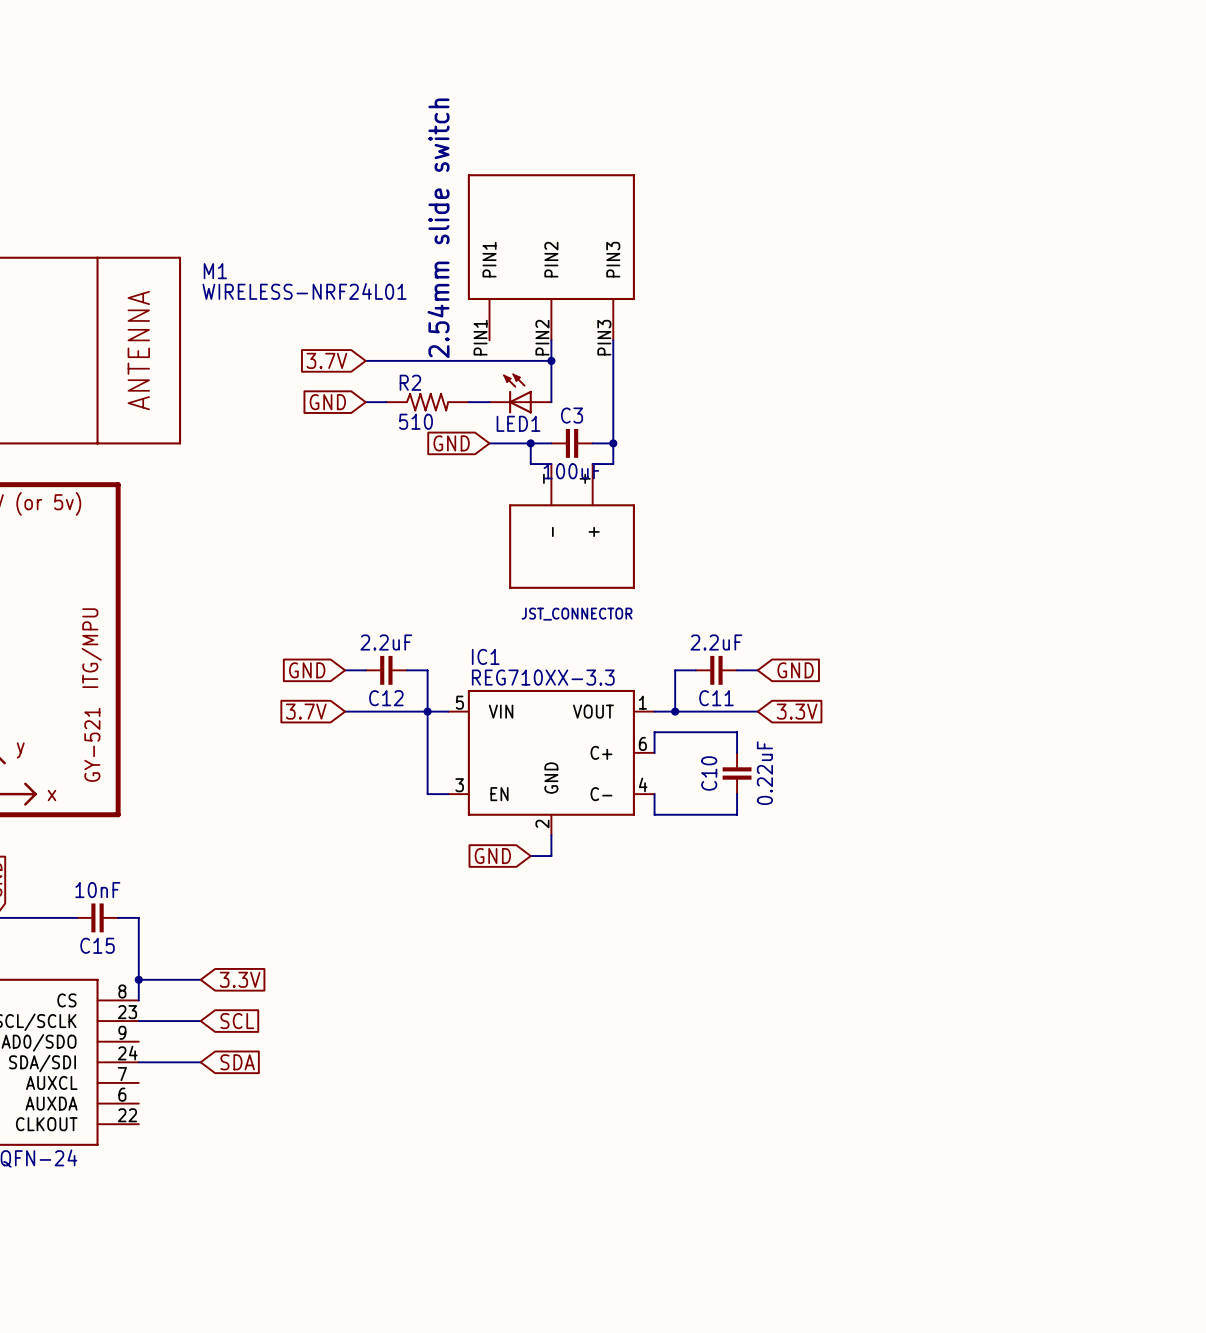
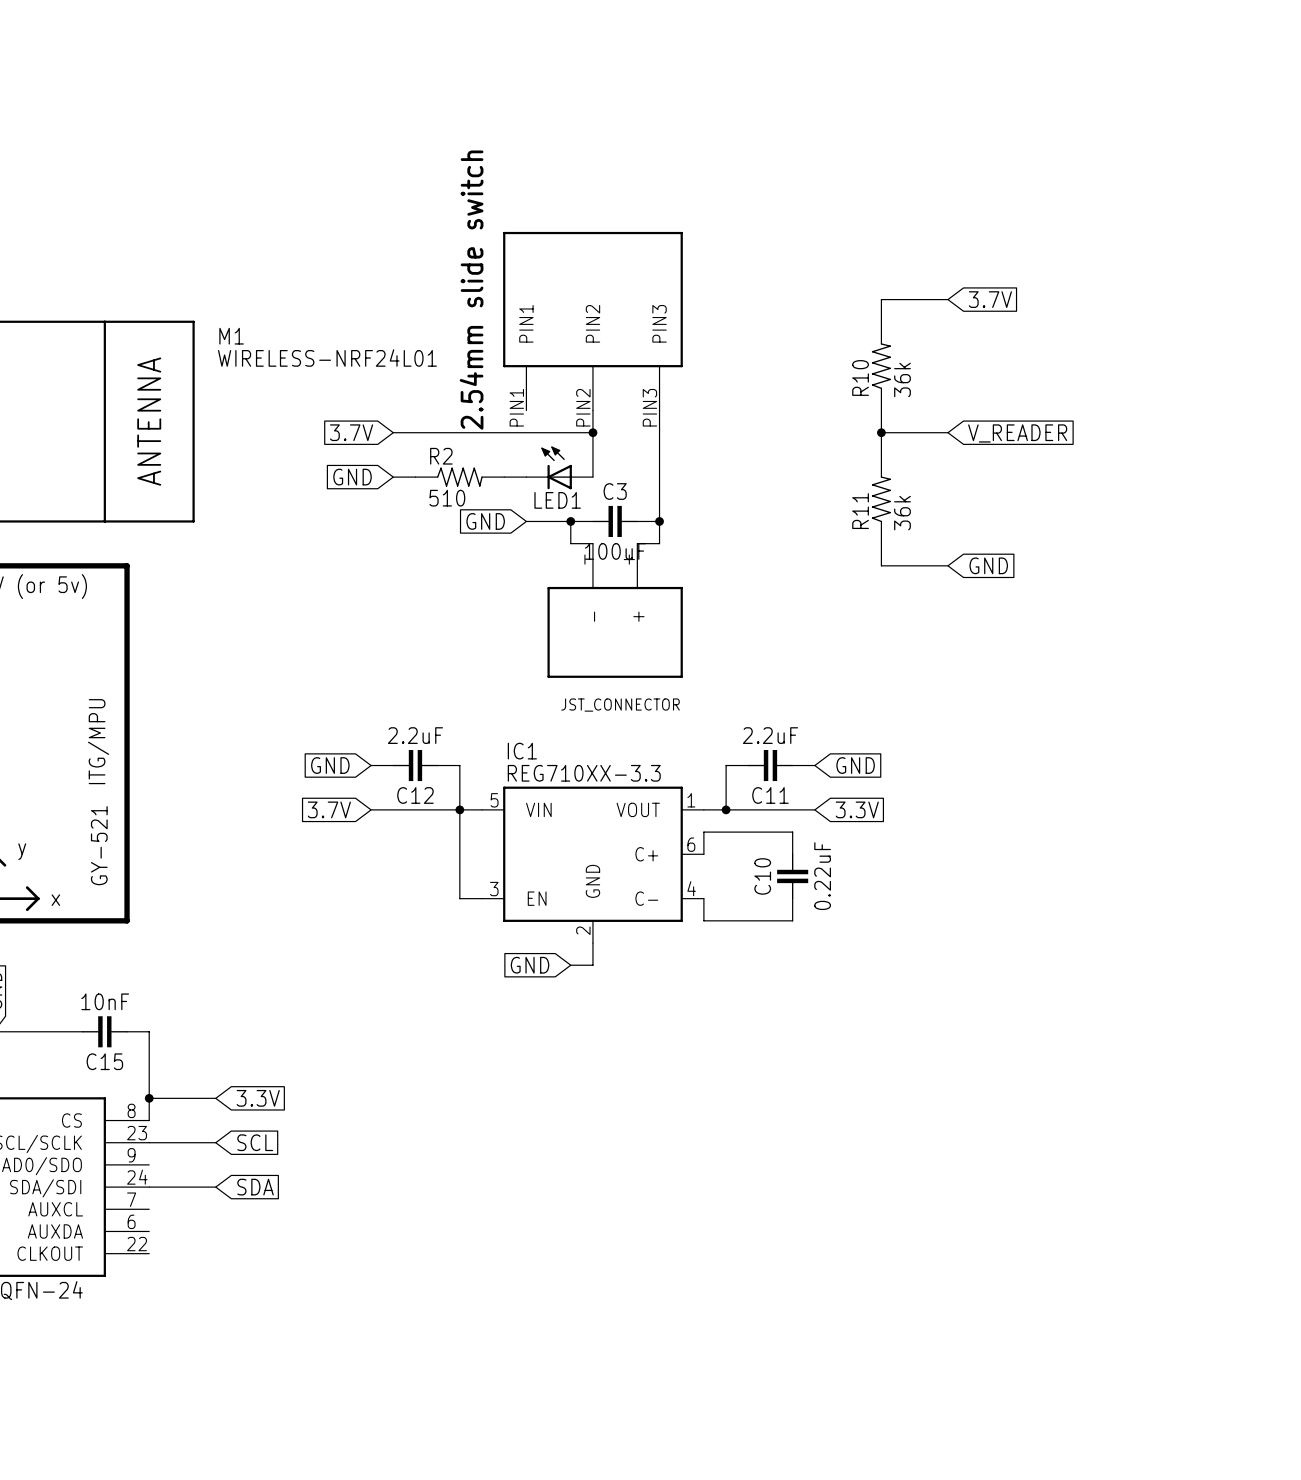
wire: none -> (947, 299) (881, 299) (881, 321)
global label: none -> 3.7V (990, 299)
R10: none -> 36k (881, 366)
wire: none -> (881, 410) (881, 454)
wire: none -> (881, 432) (947, 432)
junction: none -> (881, 432)
global label: none -> V_READER (1017, 433)
R11: none -> 36k (881, 499)
wire: none -> (881, 543) (881, 565) (947, 565)
global label: none -> GND (988, 565)

